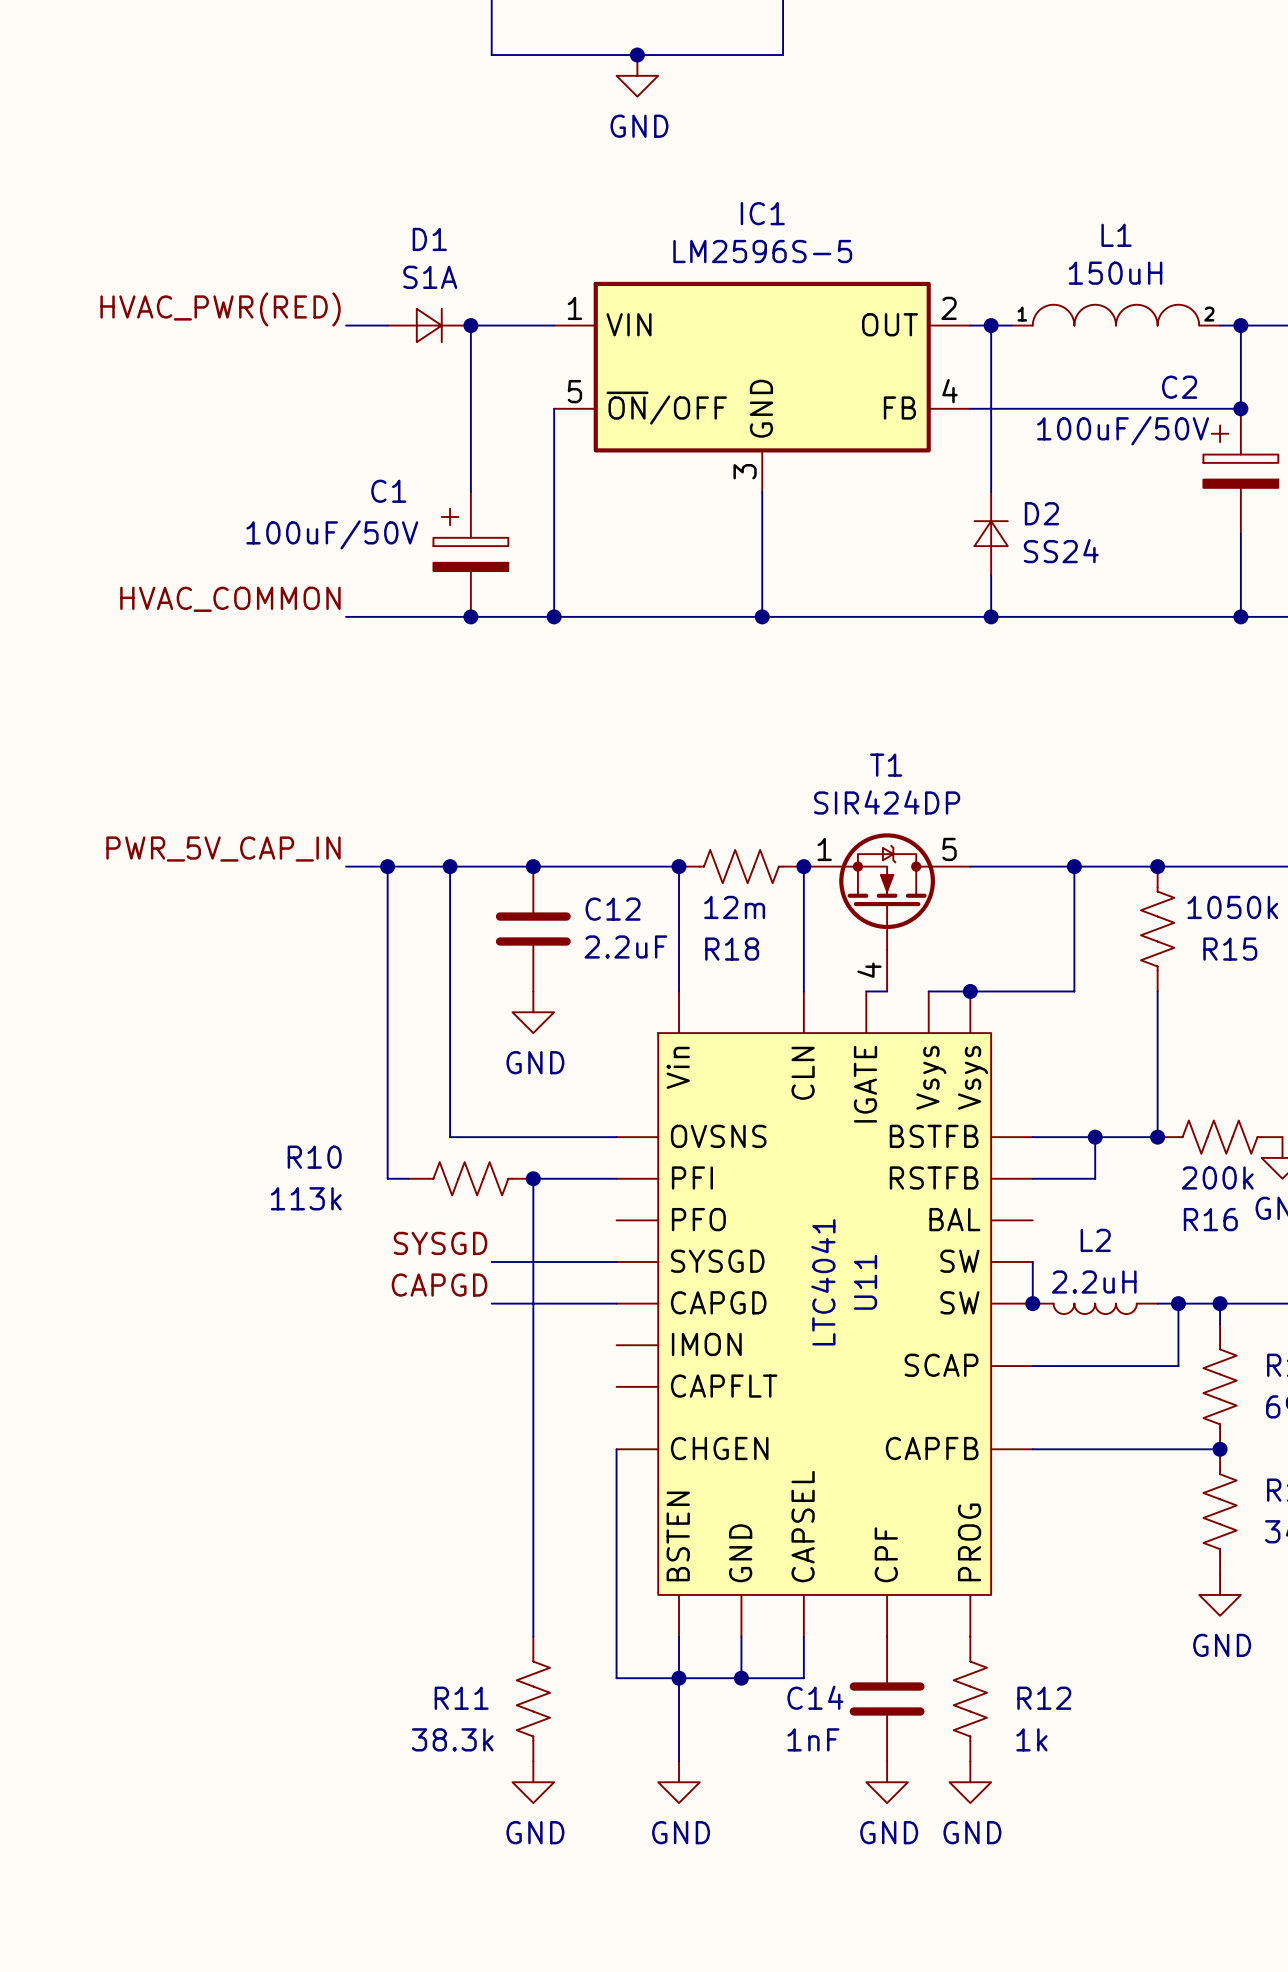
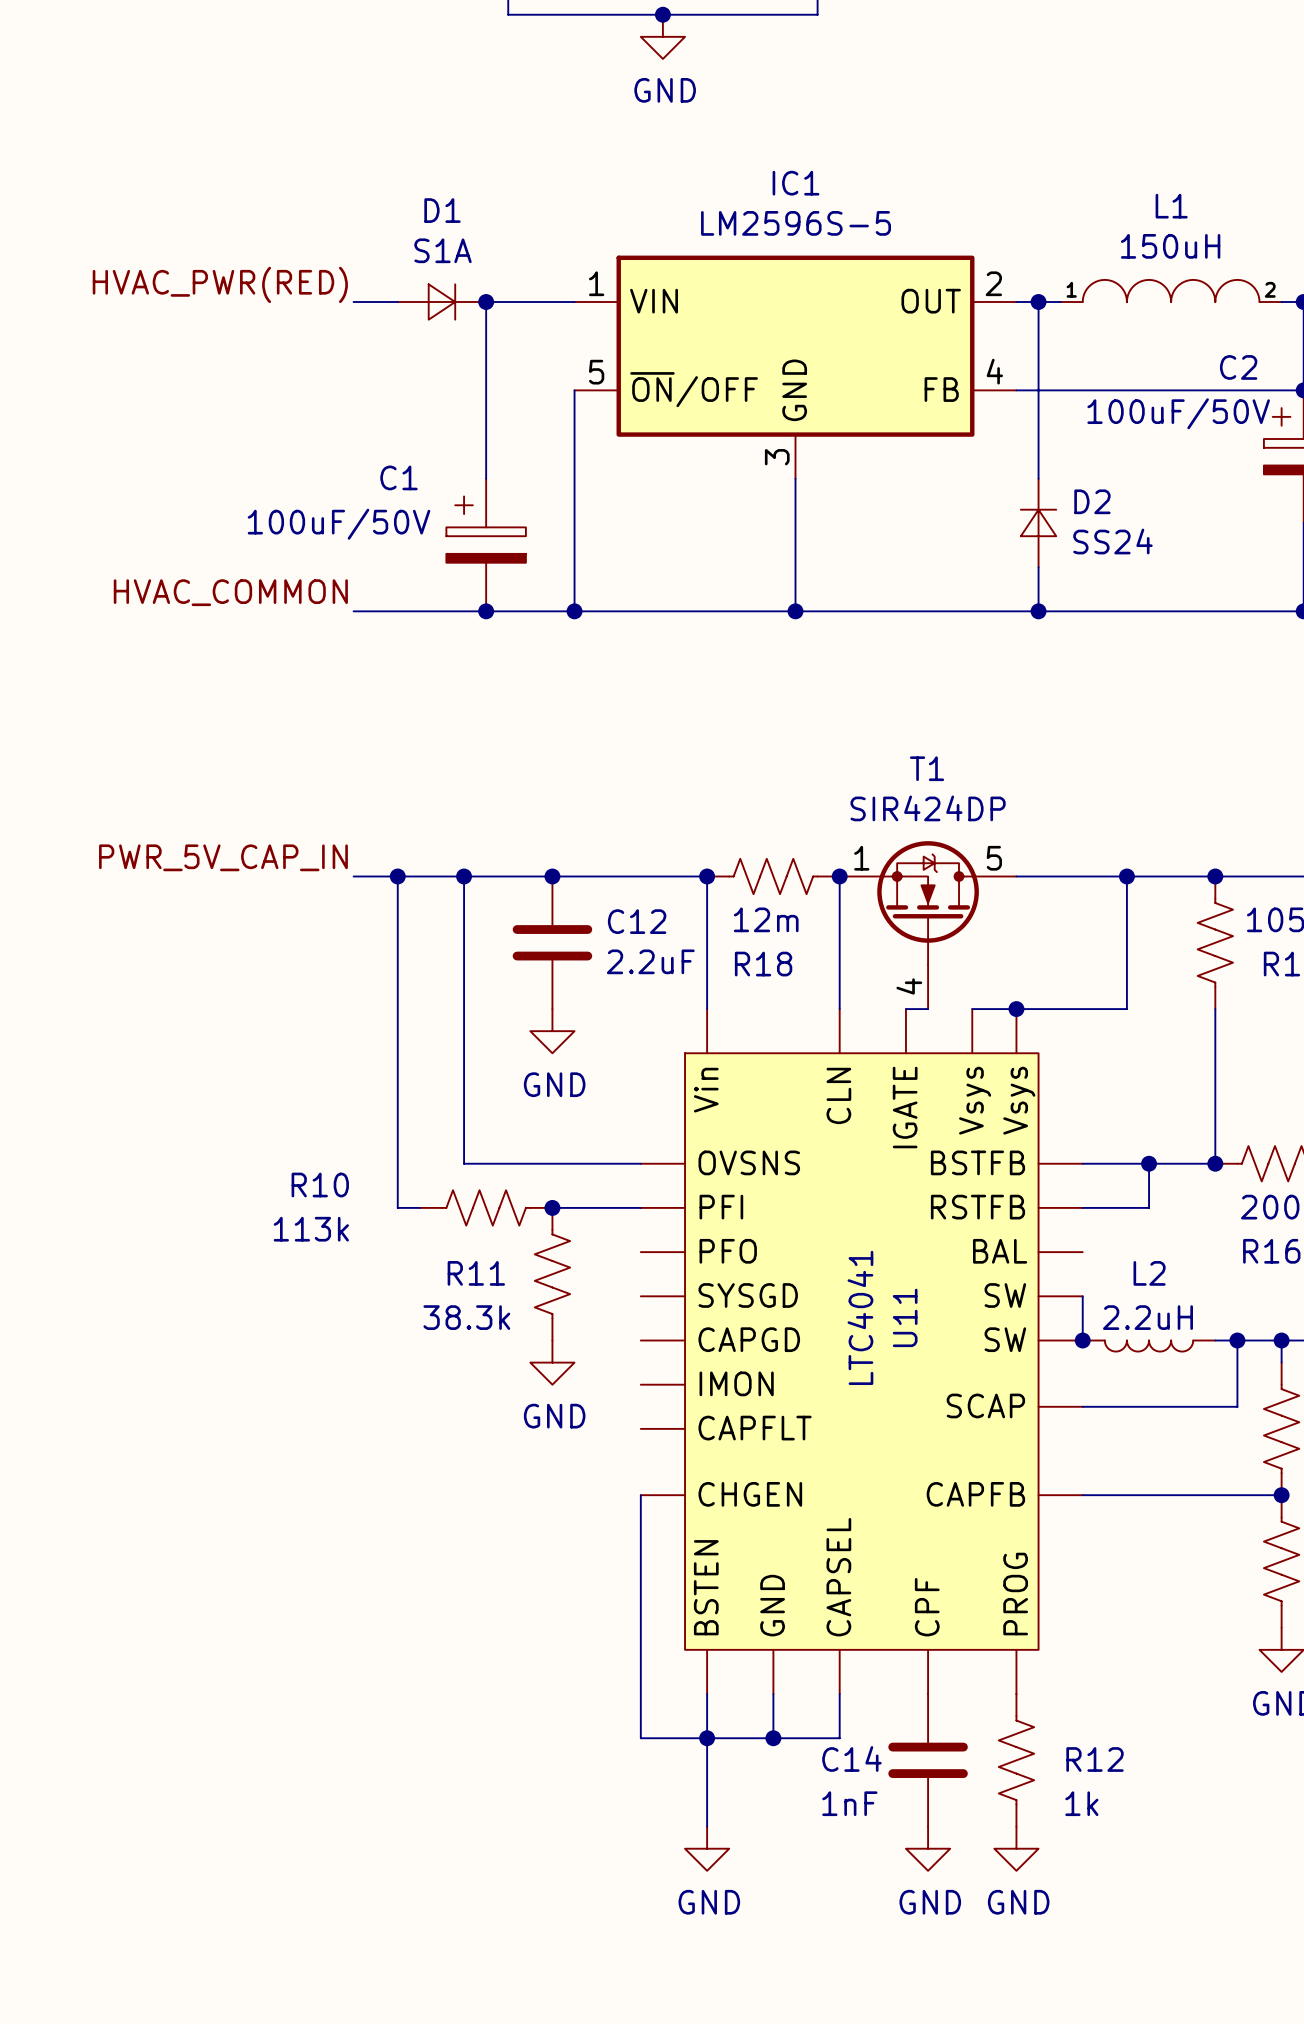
wire: (533, 1178) (533, 1636) -> none
label: SYSGD (440, 1243) -> none
wire: (491, 1262) (616, 1262) -> none
label: CAPGD (439, 1285) -> none
wire: (491, 1303) (616, 1303) -> none
power symbol: none -> GND (552, 1362)
R11 position: (533, 1699) -> (552, 1274)
power symbol: GND (533, 1782) -> none

